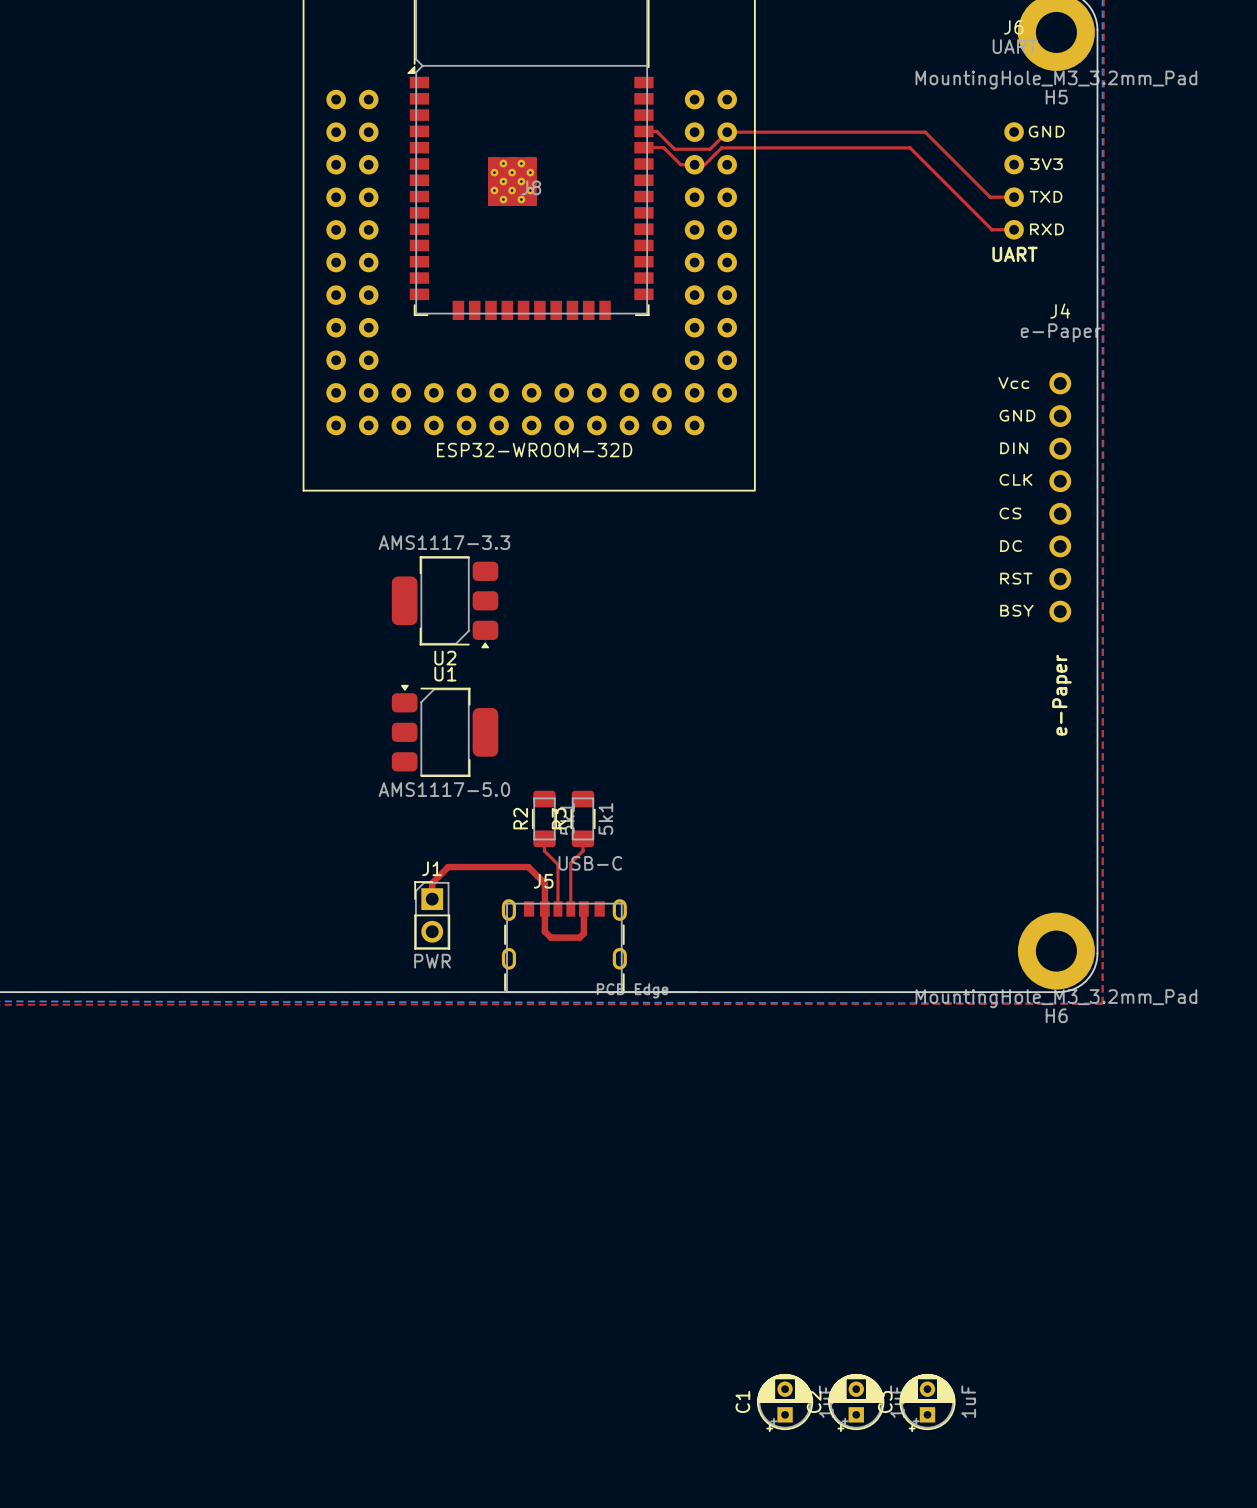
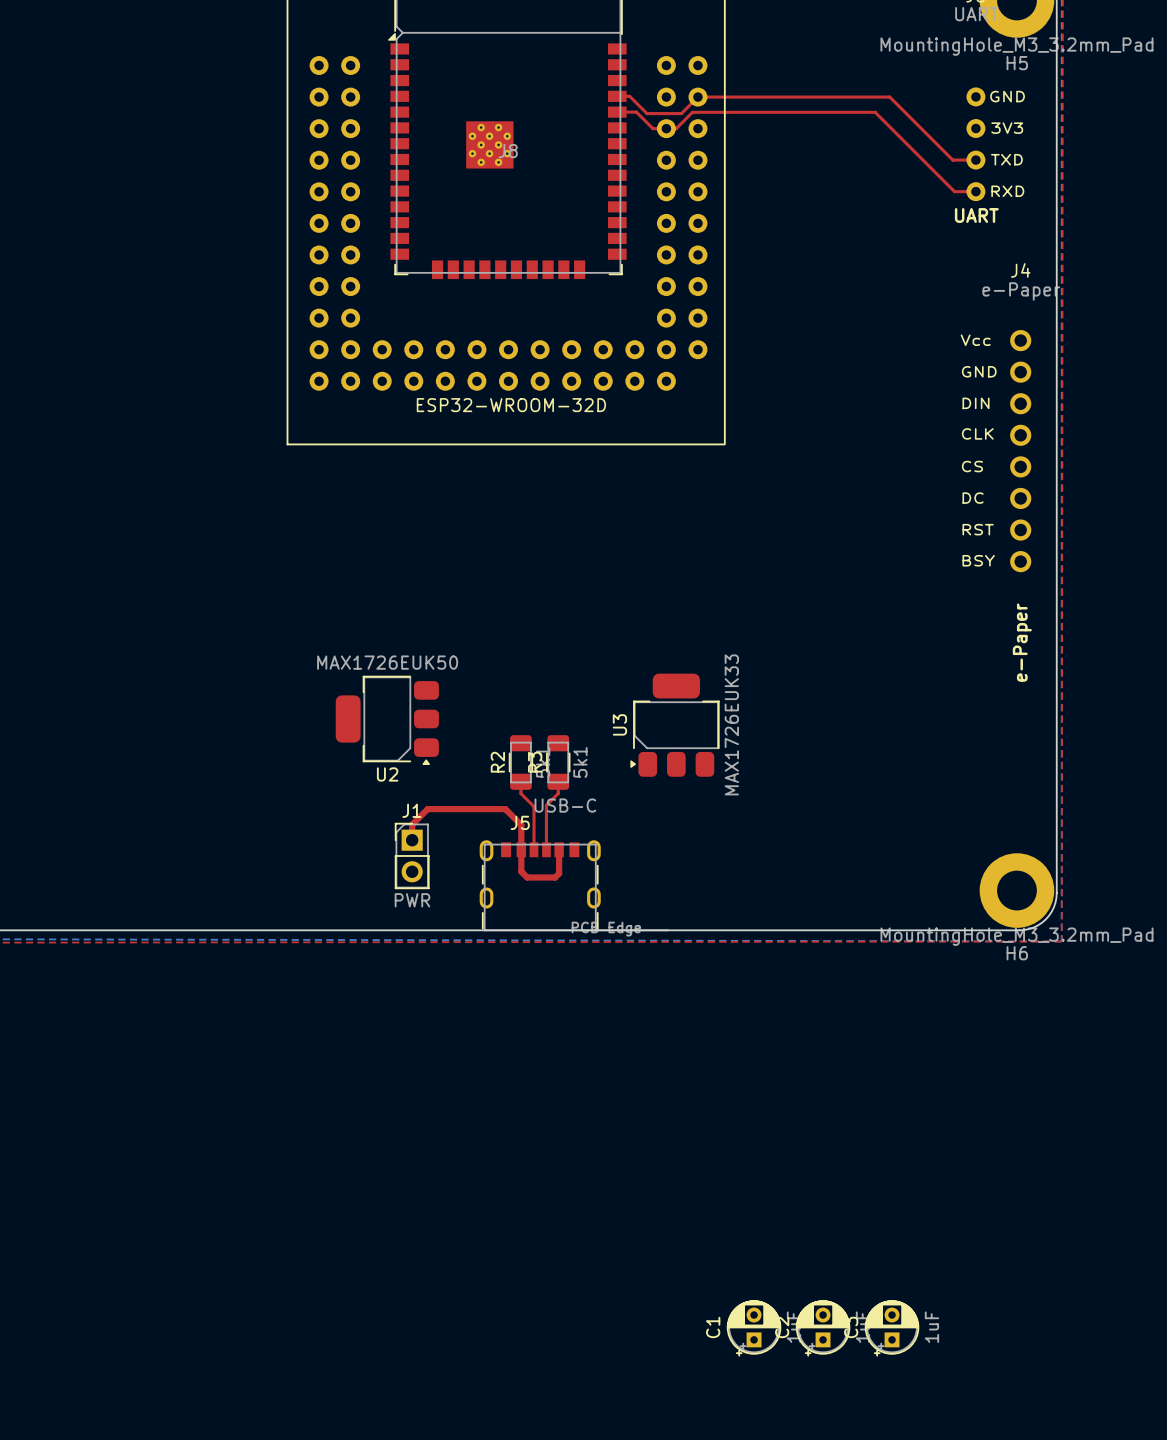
U2 value: AMS1117-3.3 (444, 542) -> MAX1726EUK50 (387, 662)
U2 position: (445, 602) -> (387, 720)
U1: AMS1117-5.0 (445, 730) -> none
U3: none -> MAX1726EUK33 (674, 725)

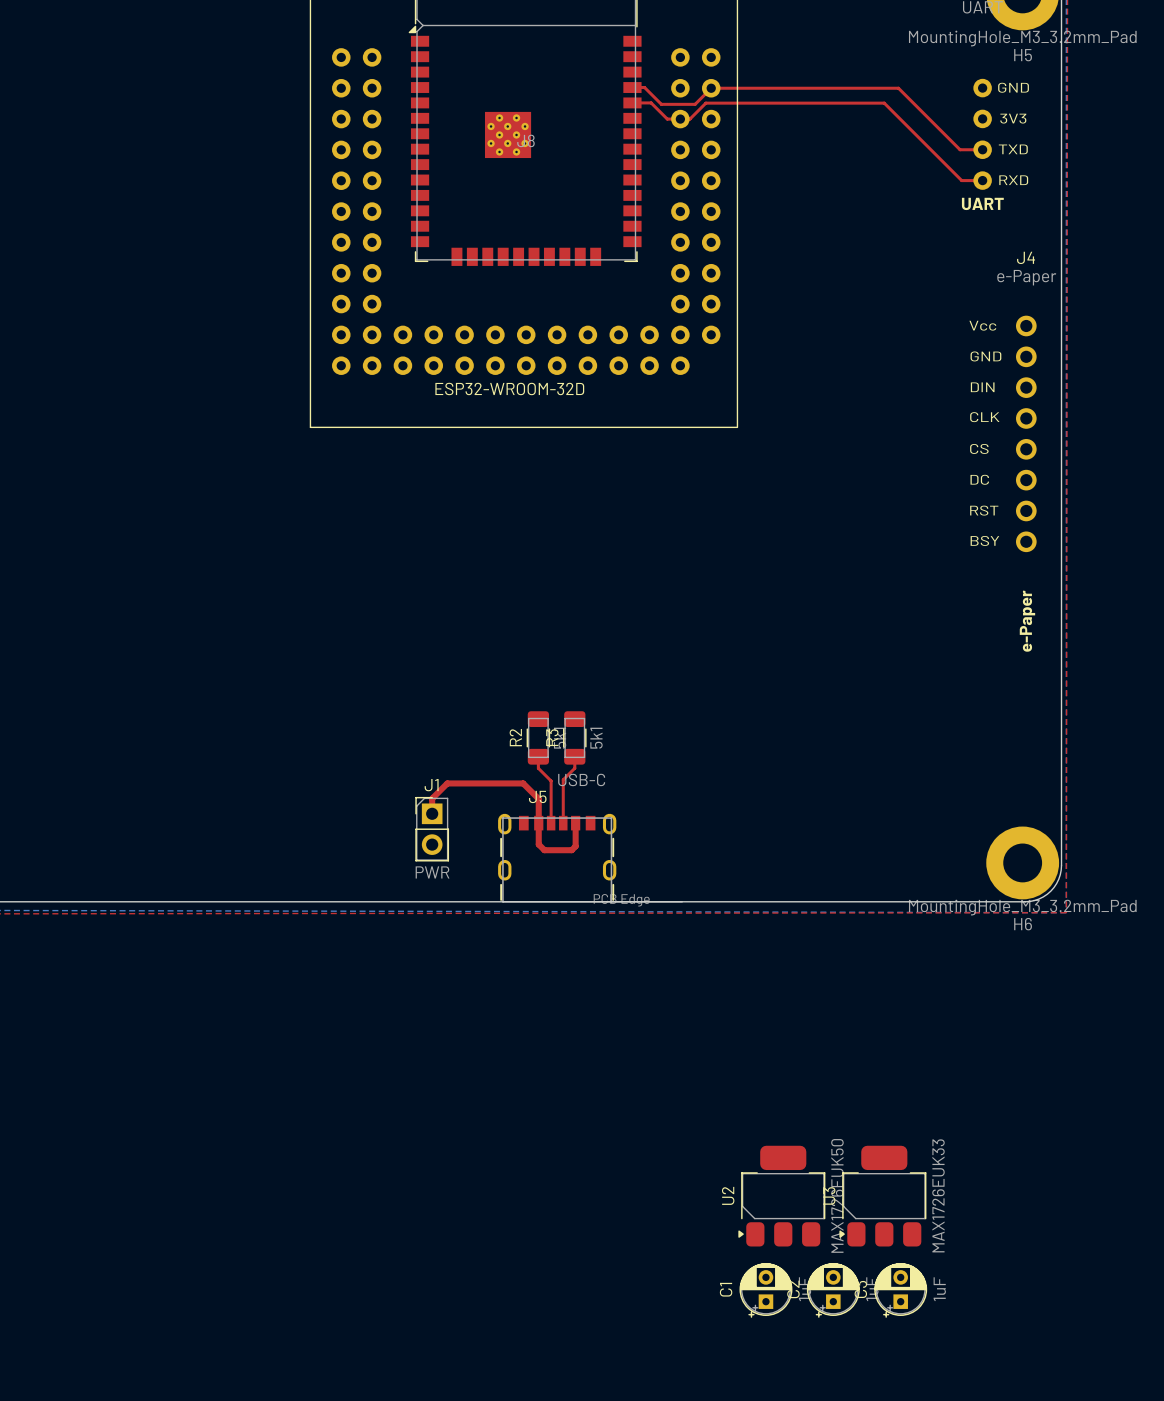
U2 rotation: 0° (387, 720) -> 90° clockwise (781, 1196)
U2 position: (387, 720) -> (781, 1196)
U3 position: (674, 725) -> (882, 1196)

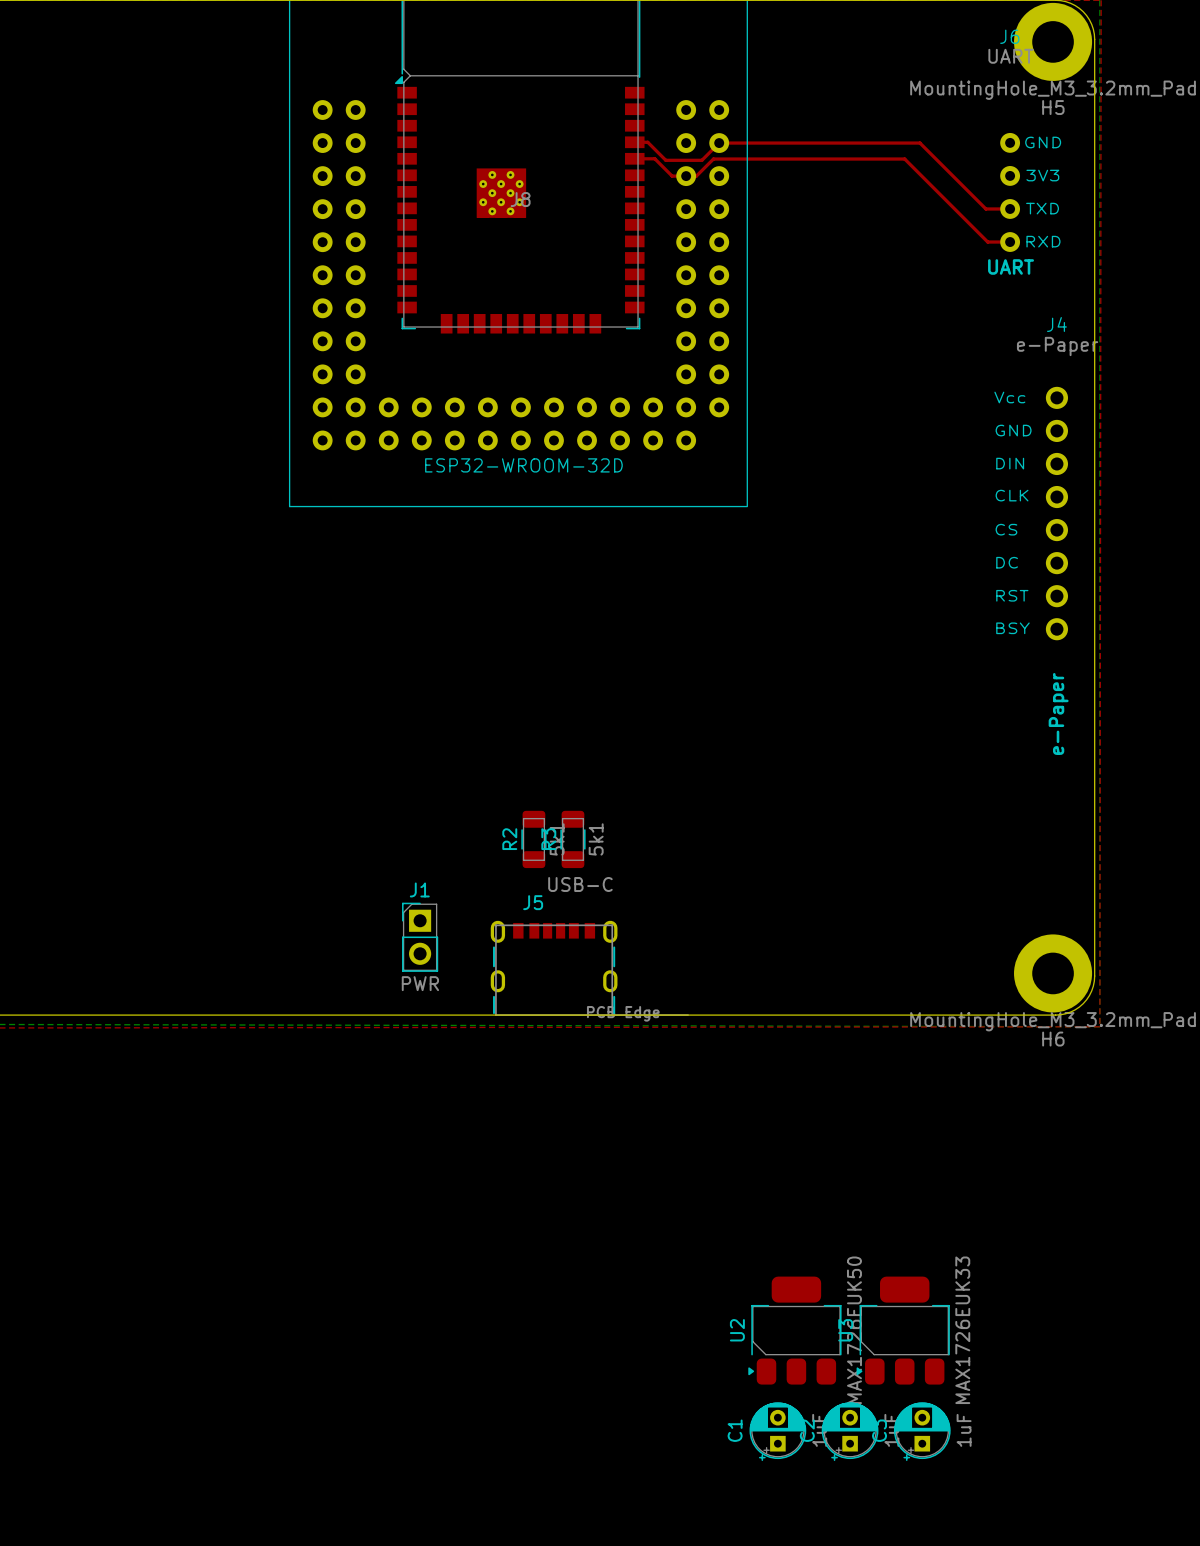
top track: (538, 756) (538, 768) (551, 781) (551, 823) -> none
top track: (574, 756) (574, 768) (563, 779) (563, 823) -> none
top track: (432, 813) (432, 798) (447, 783) (523, 783) (538, 798) (538, 844) (544, 850) (571, 850) (575, 846) (575, 823) -> none

